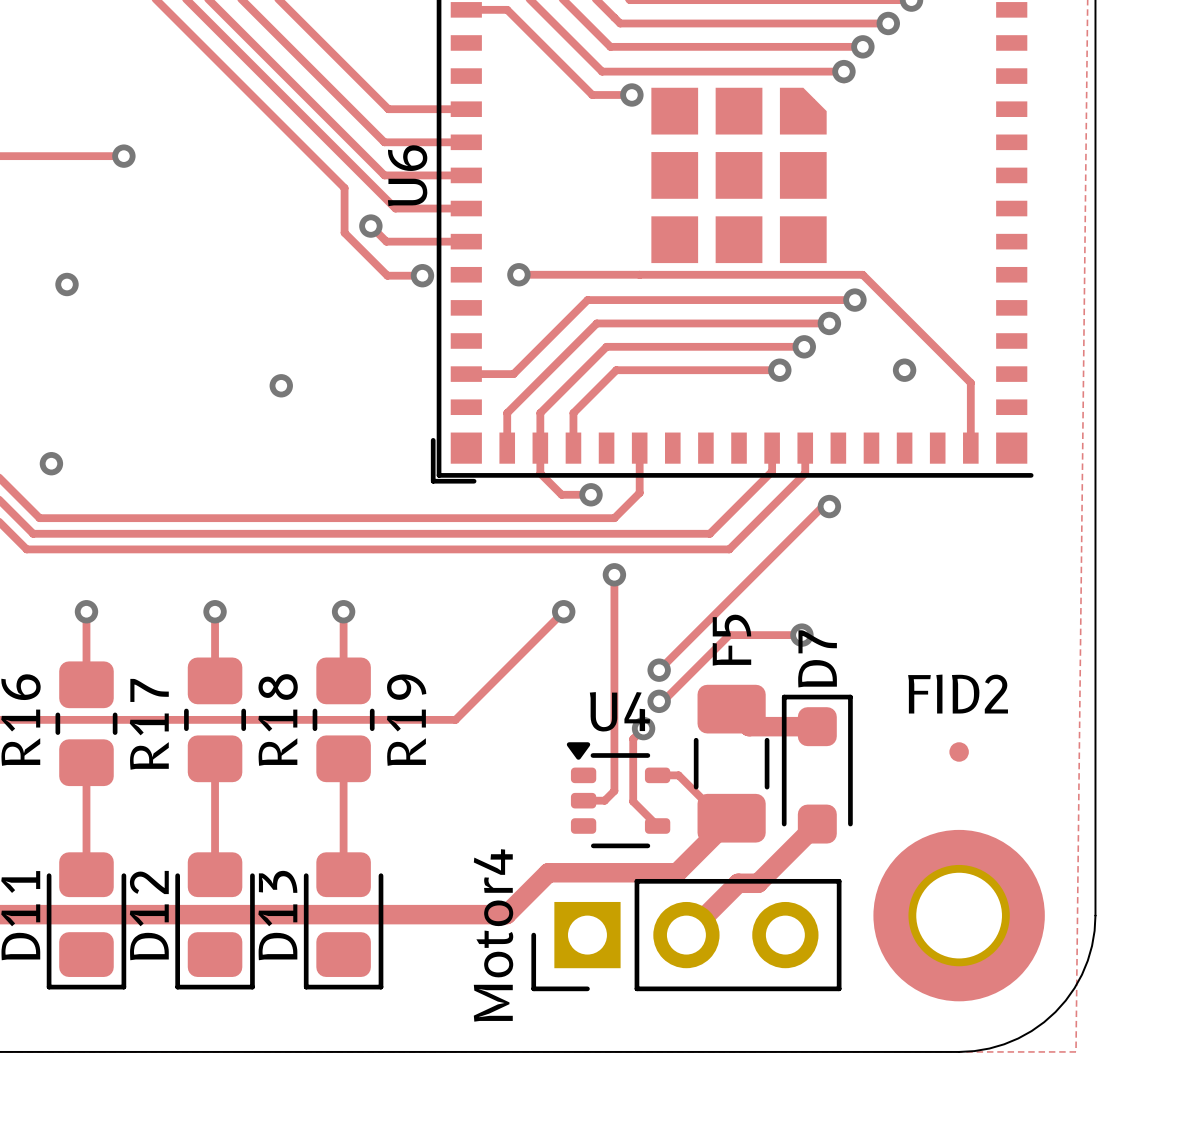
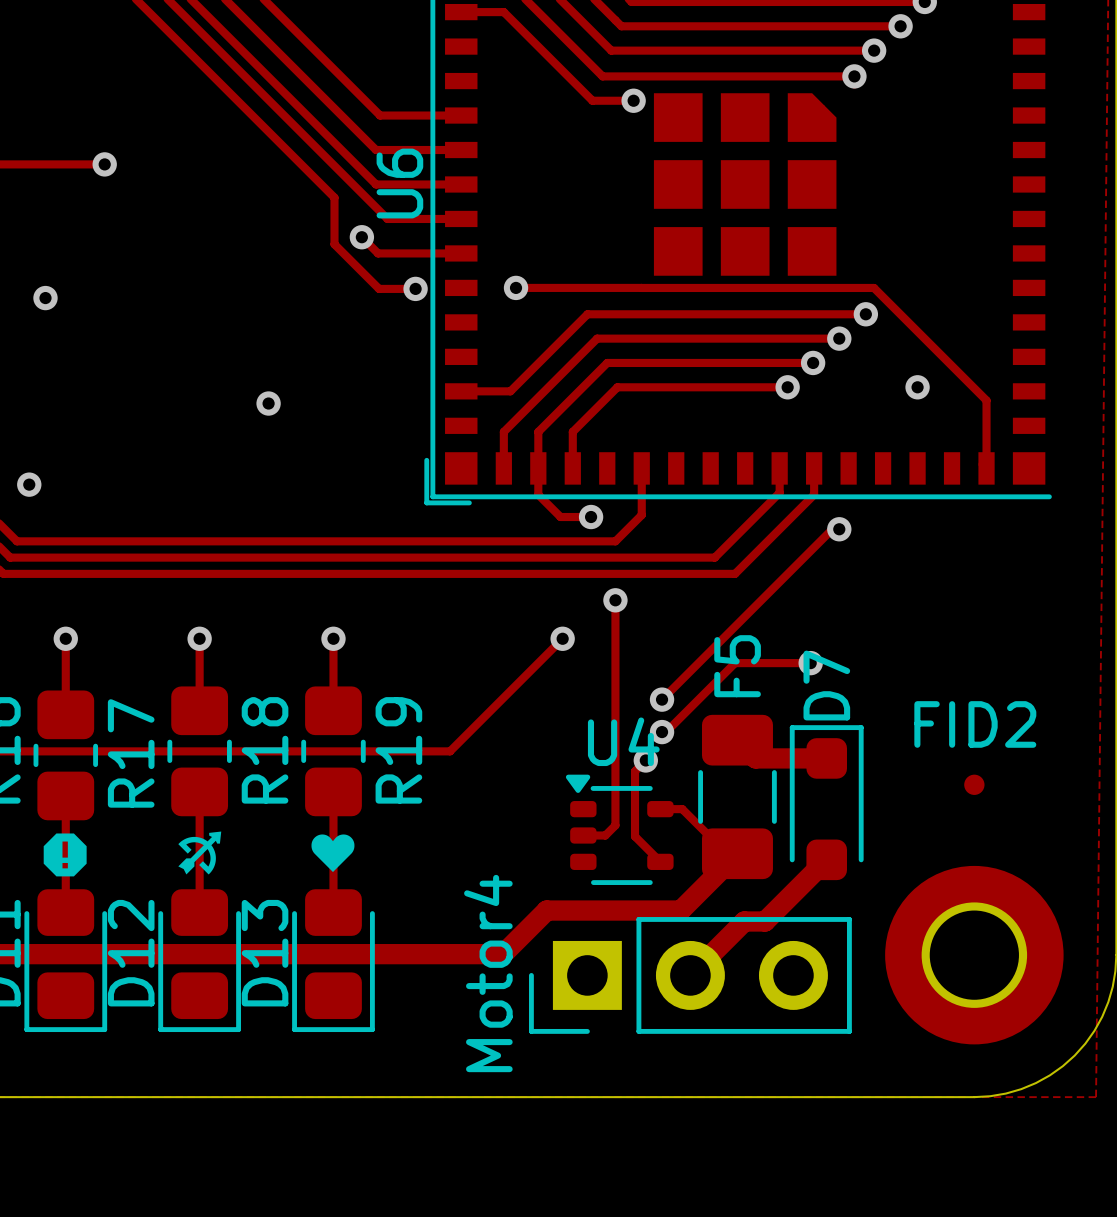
drawing: none -> [178, 831, 222, 875]
drawing: none -> [43, 833, 87, 877]
drawing: none -> [311, 834, 355, 873]

